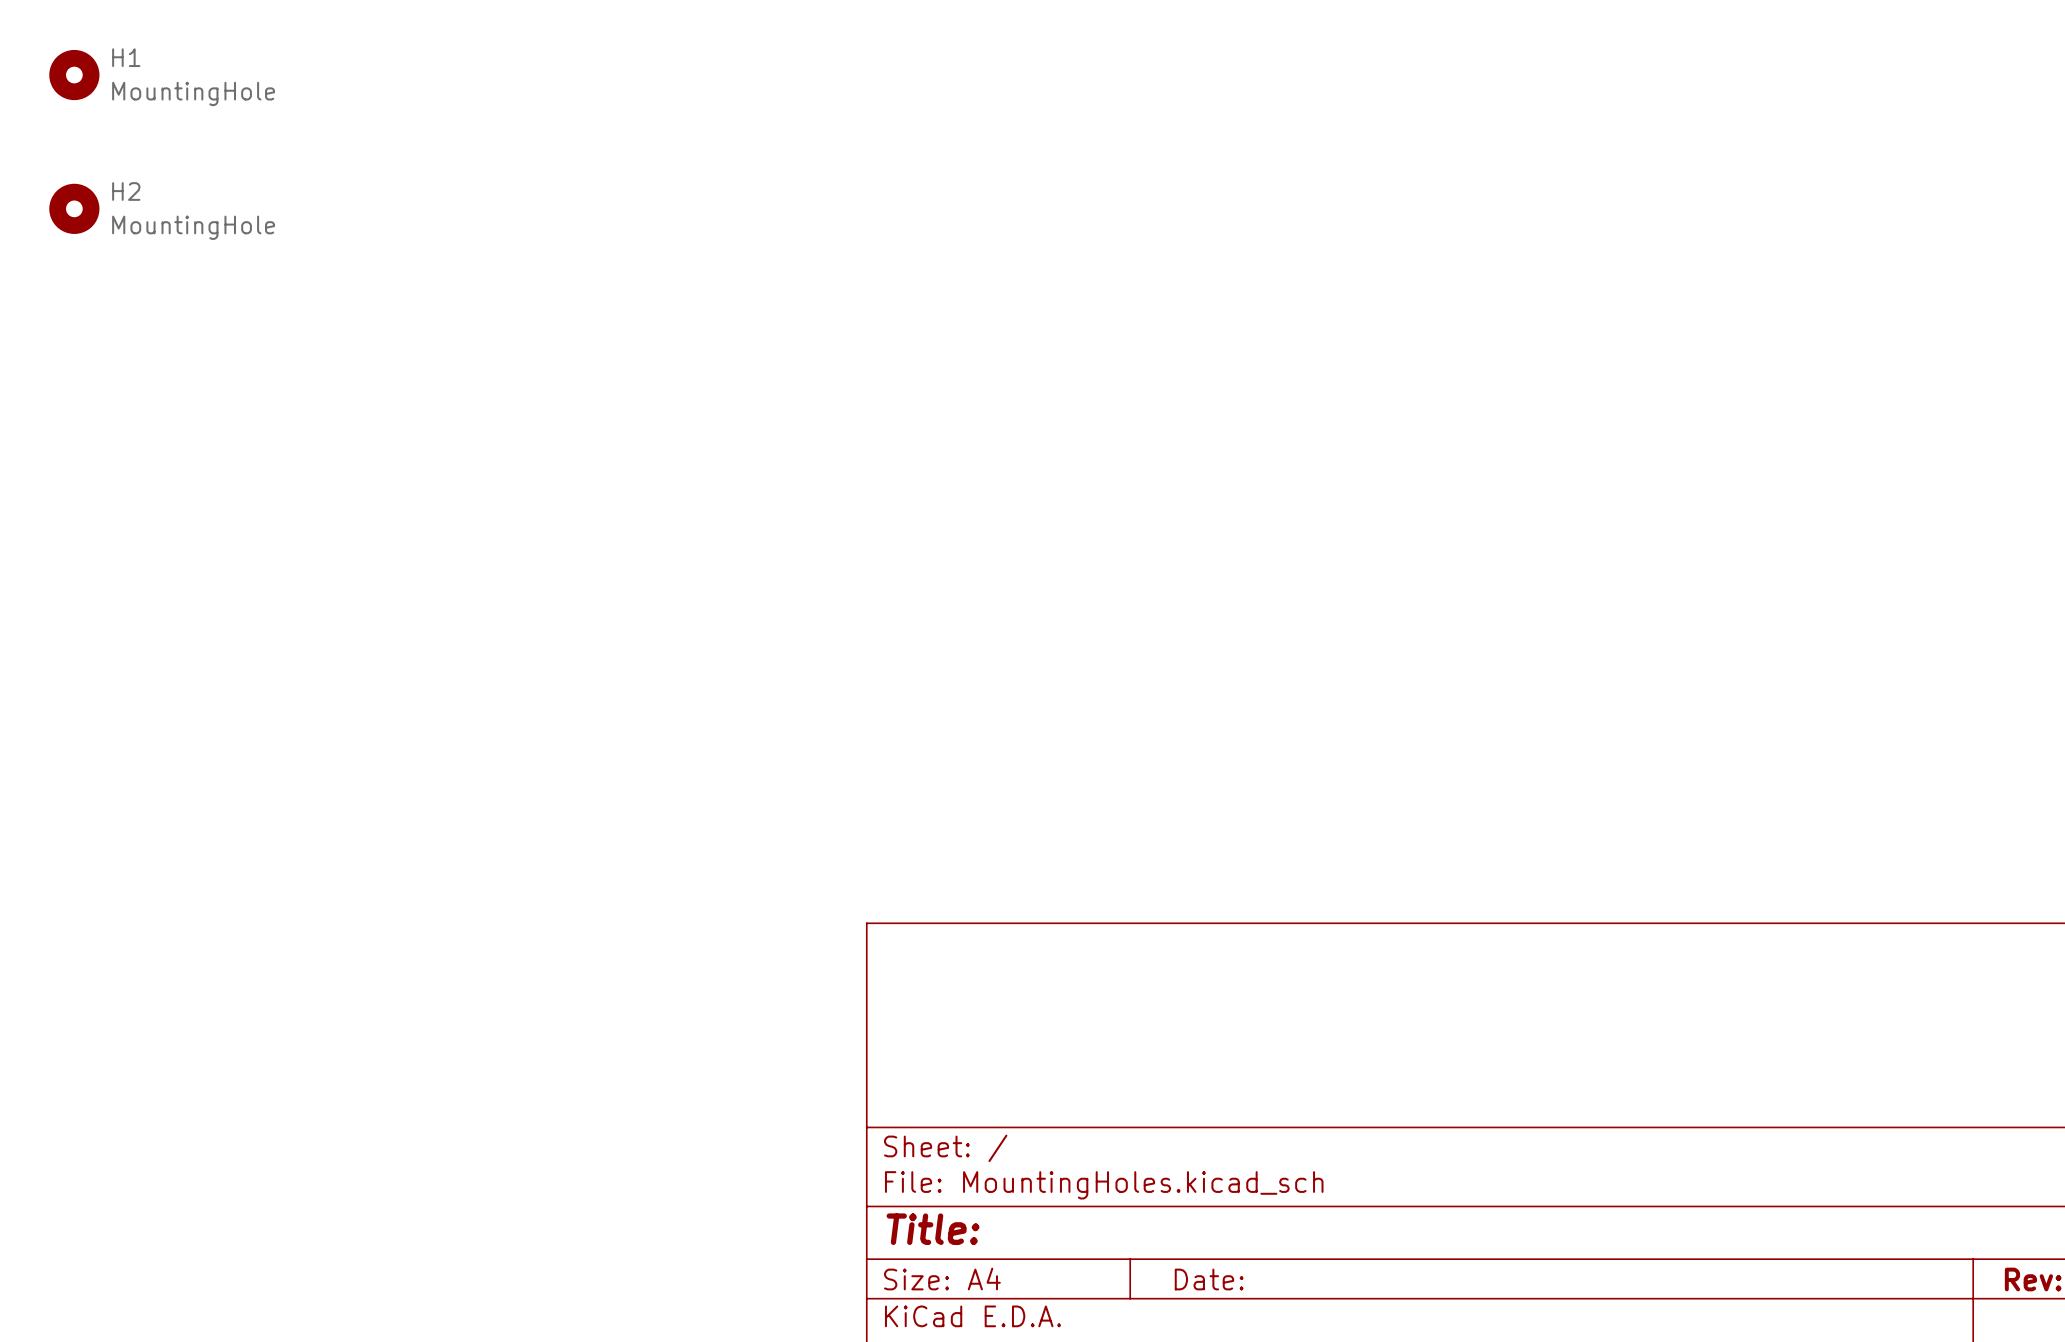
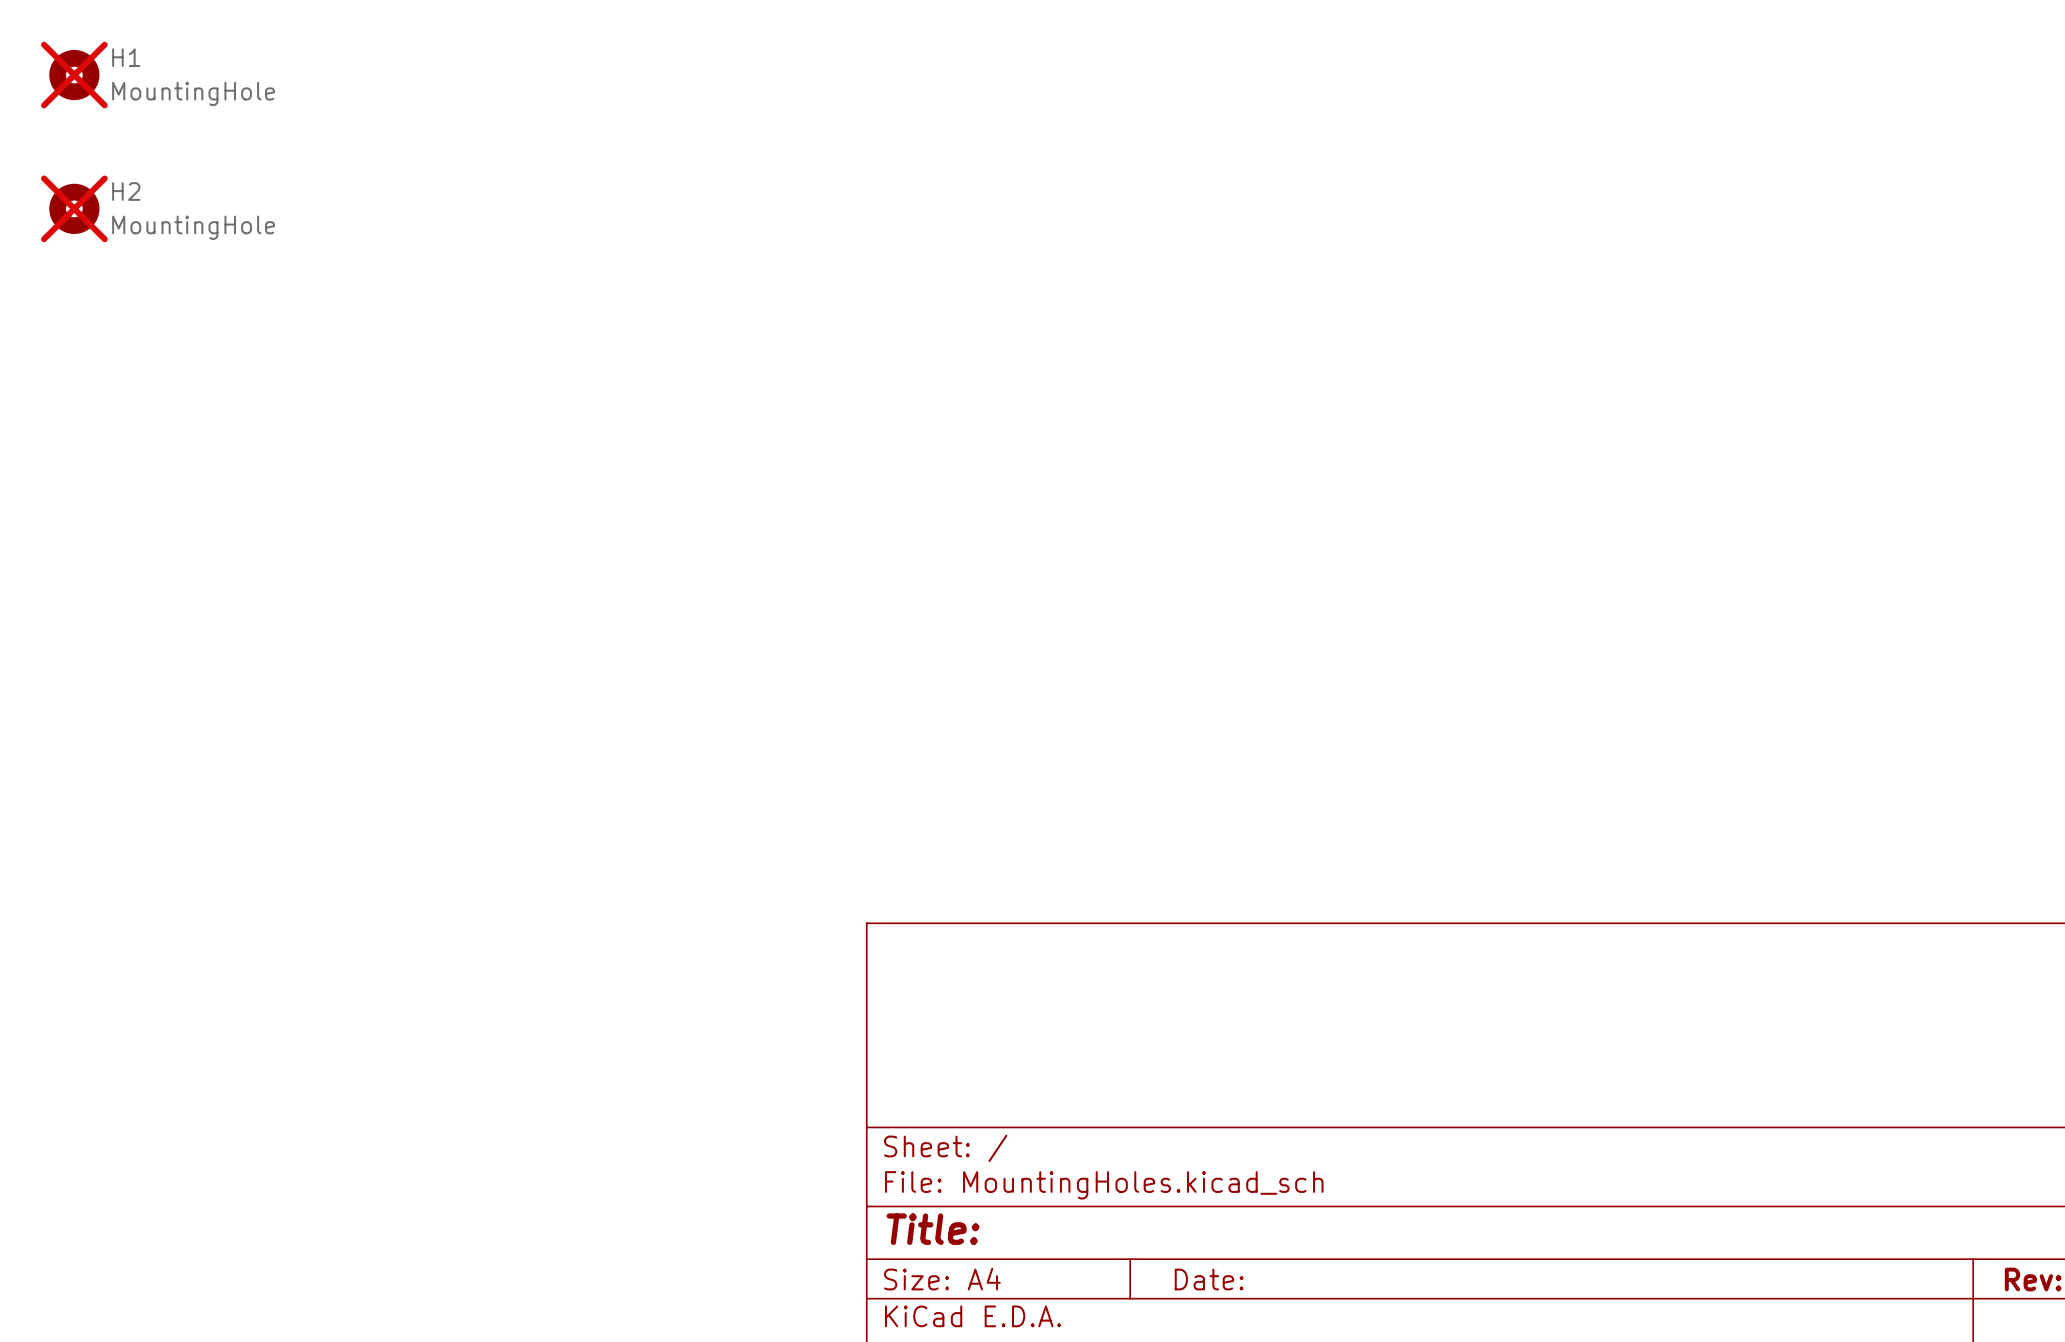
H1 do-not-place cross: none -> (74, 75)
H2 do-not-place cross: none -> (74, 208)

